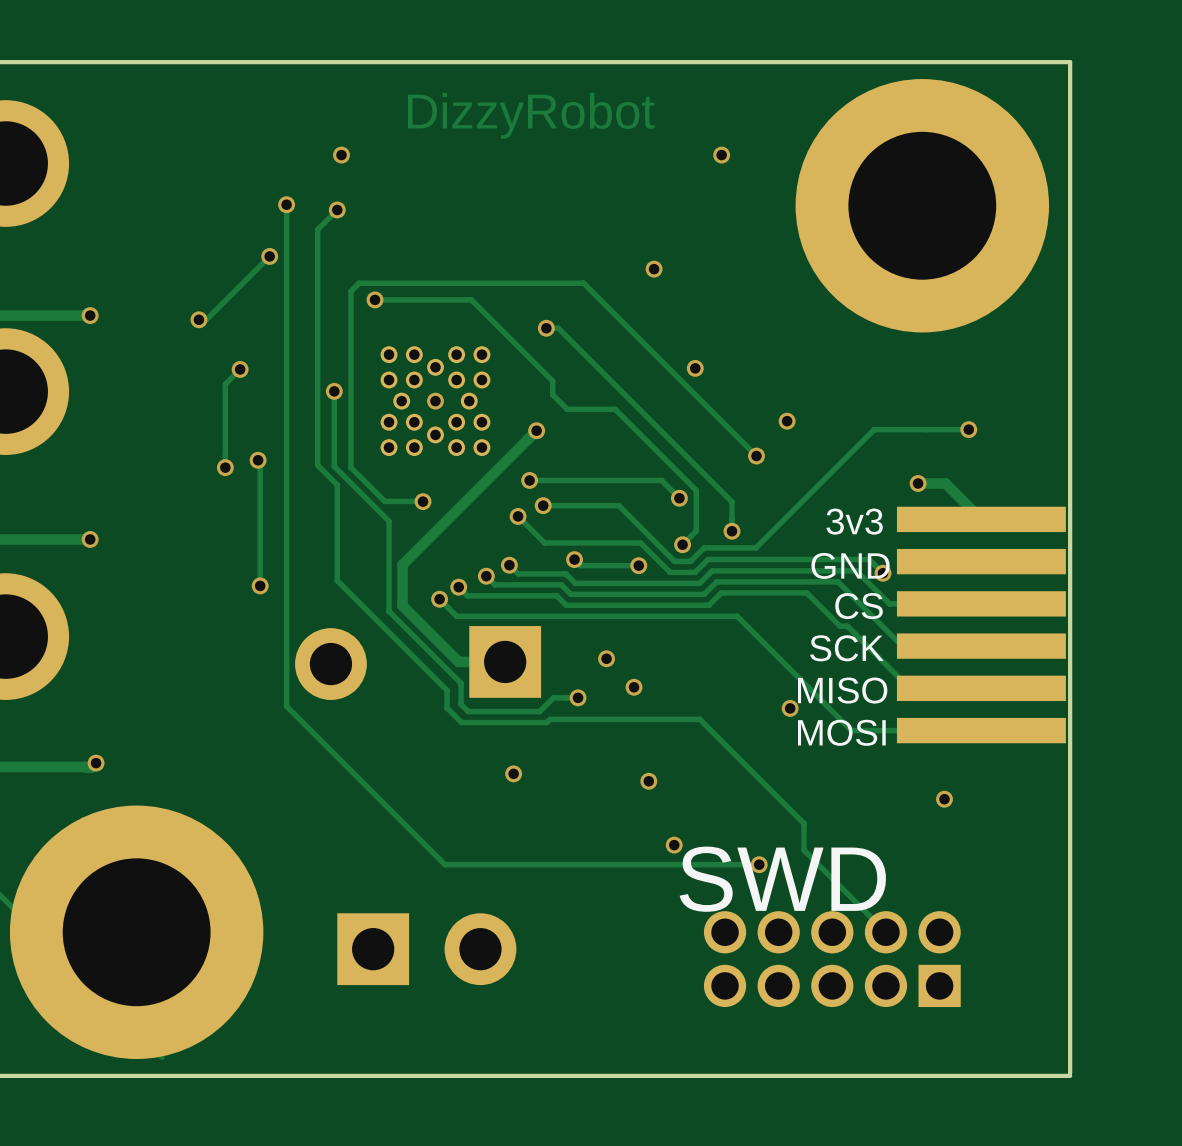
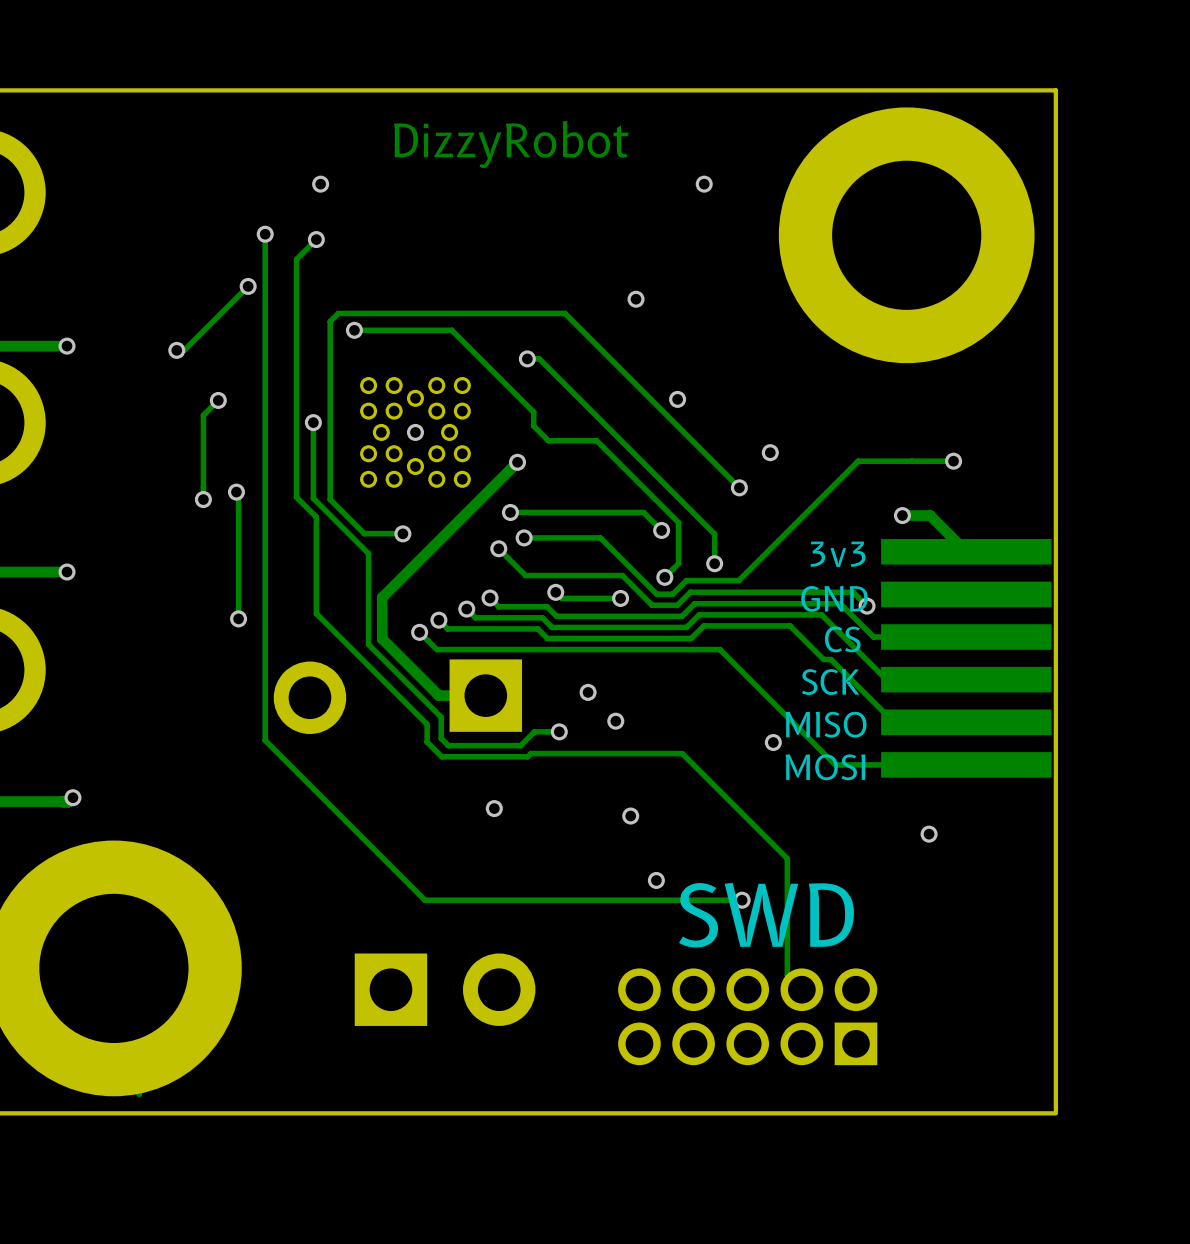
track: (804, 850) (885, 932) -> (787, 885) (787, 975) (801, 989)
part position: (426, 949) -> (445, 989)
part position: (832, 959) -> (747, 1016)

